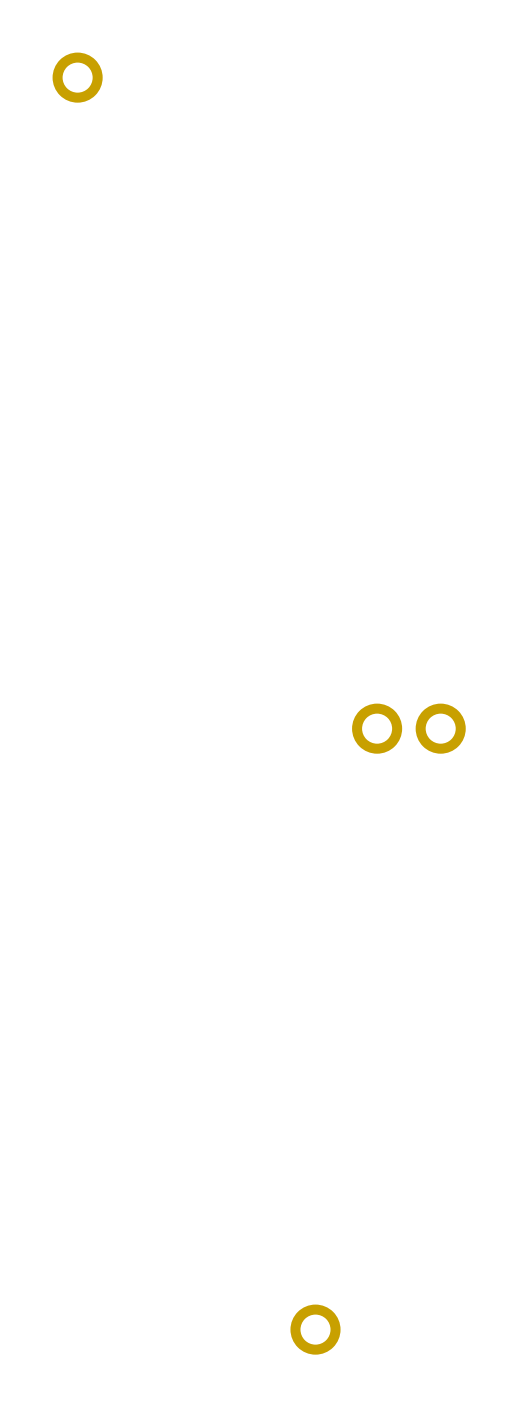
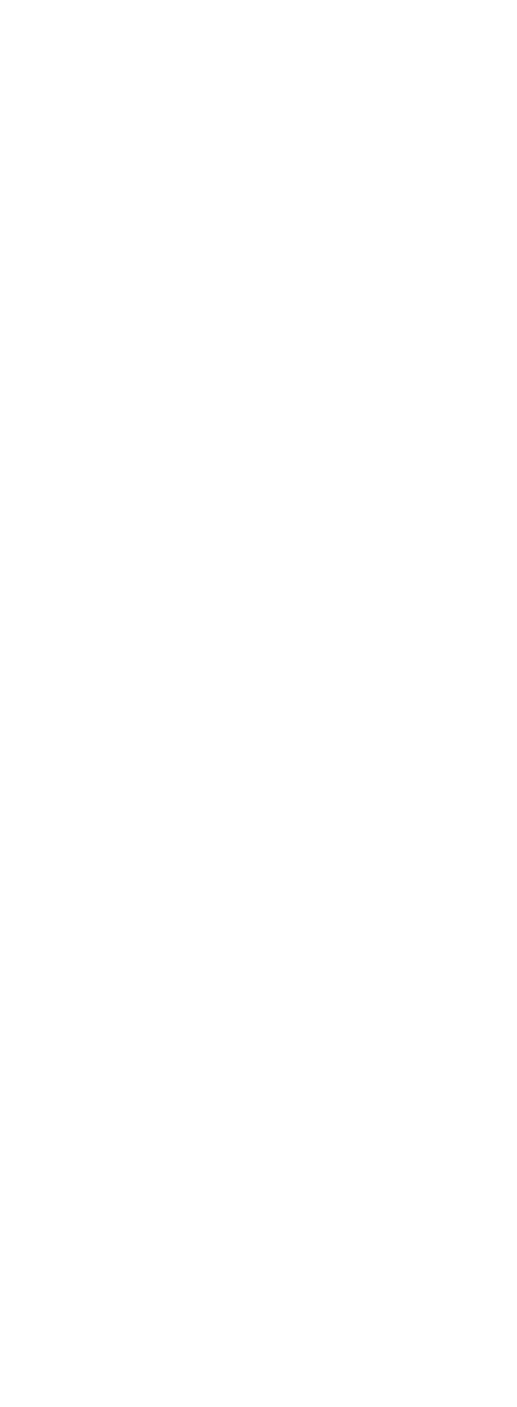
part: (77, 77) -> none
part: (408, 728) -> none
part: (315, 1329) -> none

